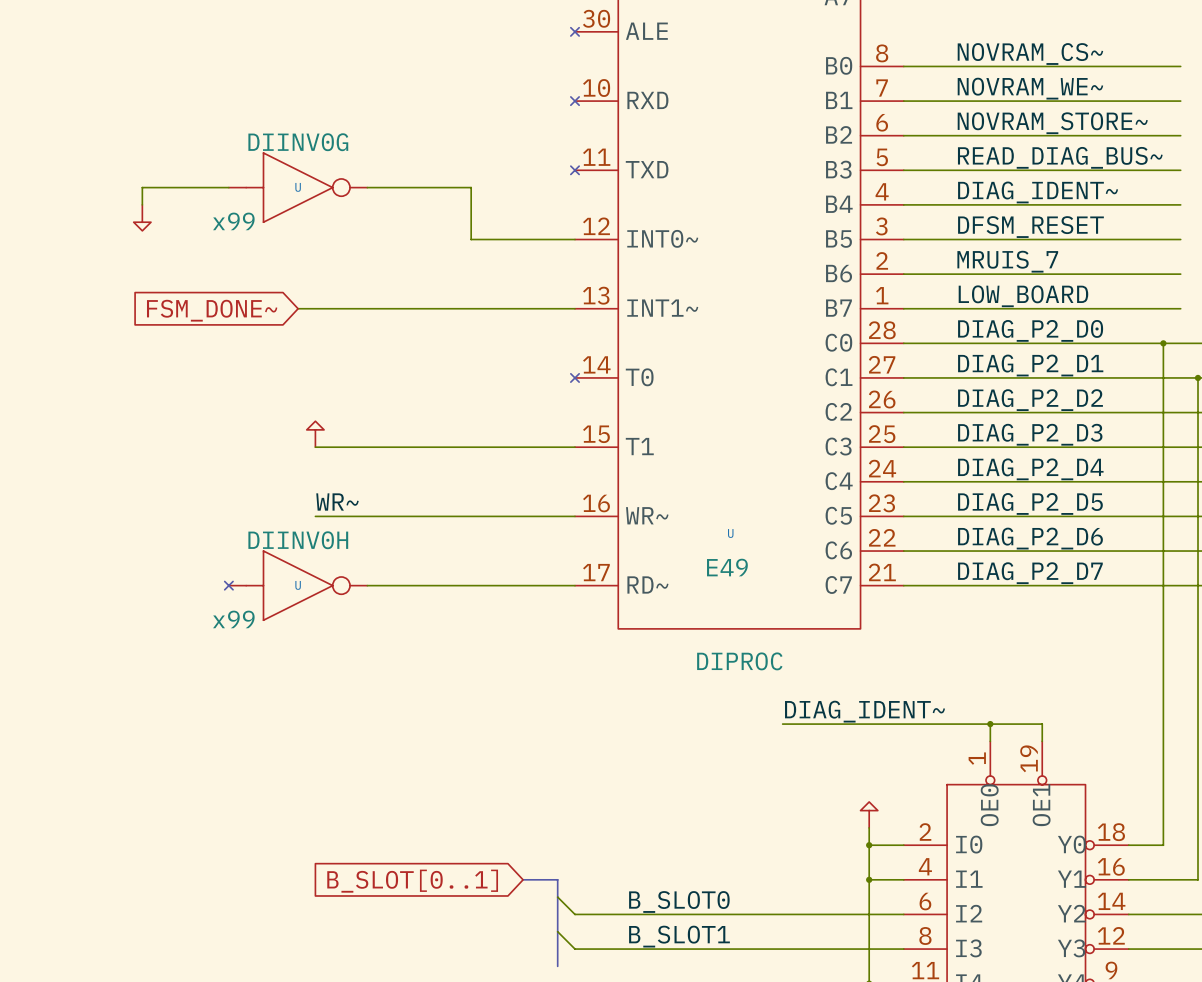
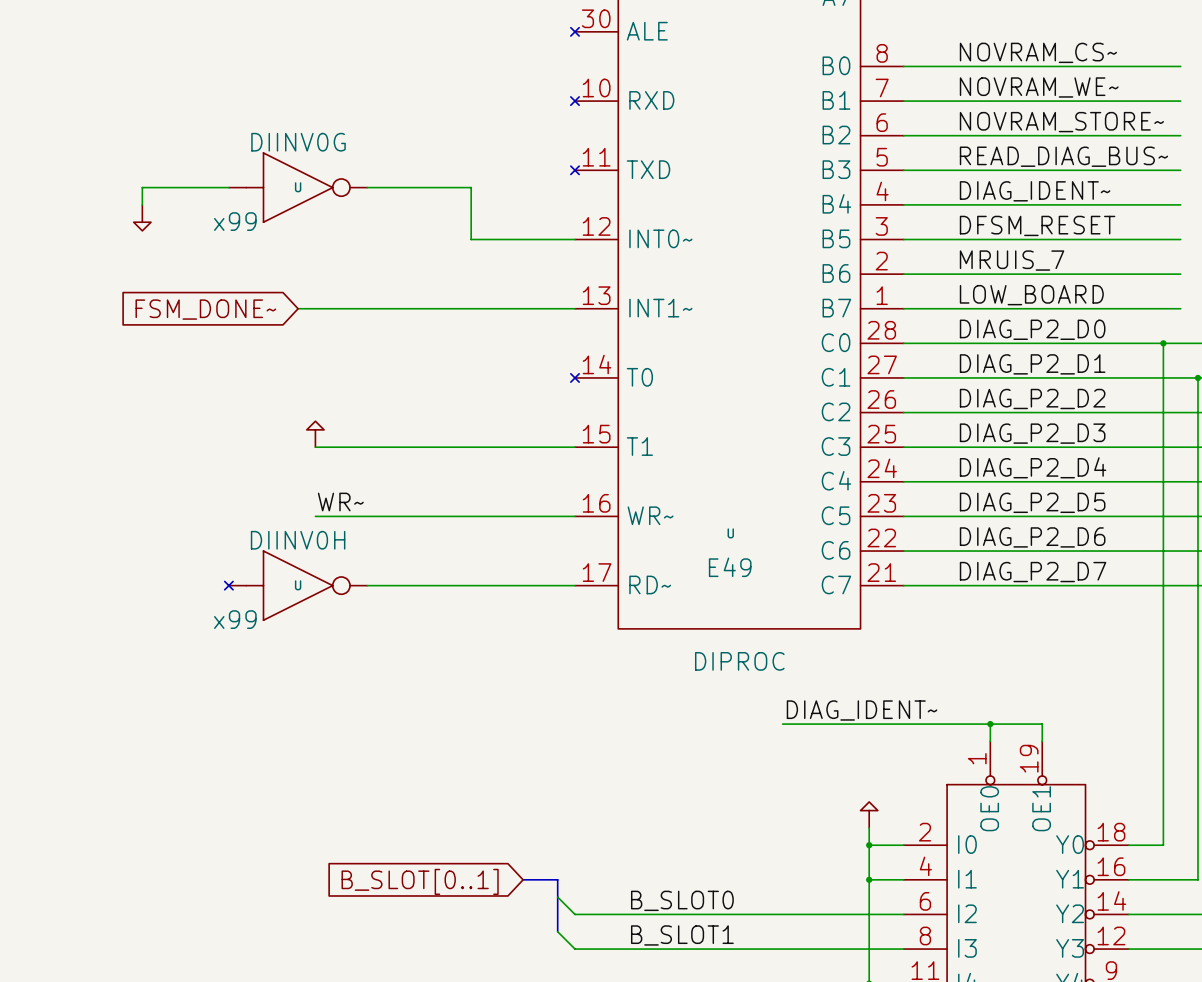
bus: (557, 931) (557, 966) -> none

